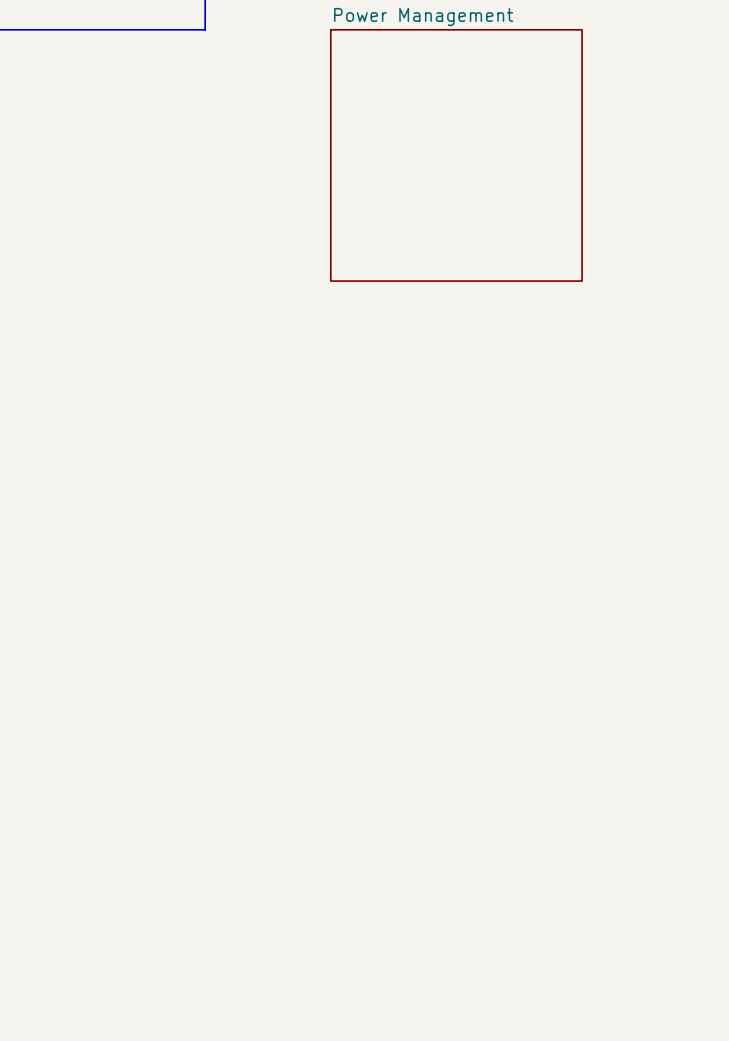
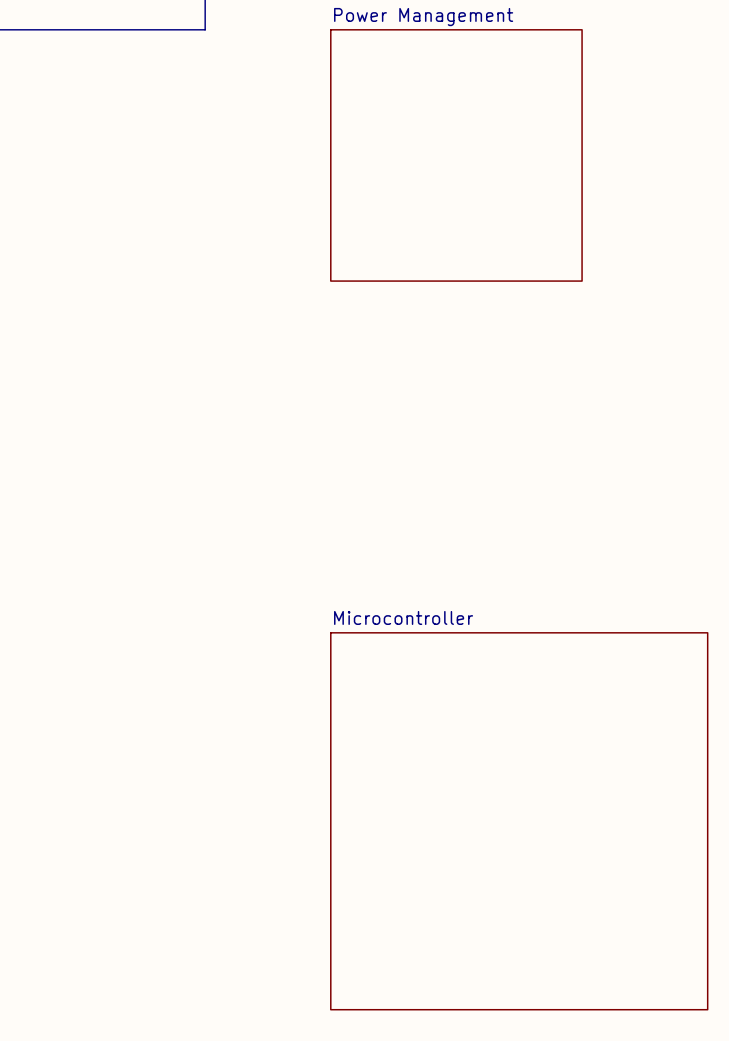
sheet Microcontroller: none -> (519, 821)

